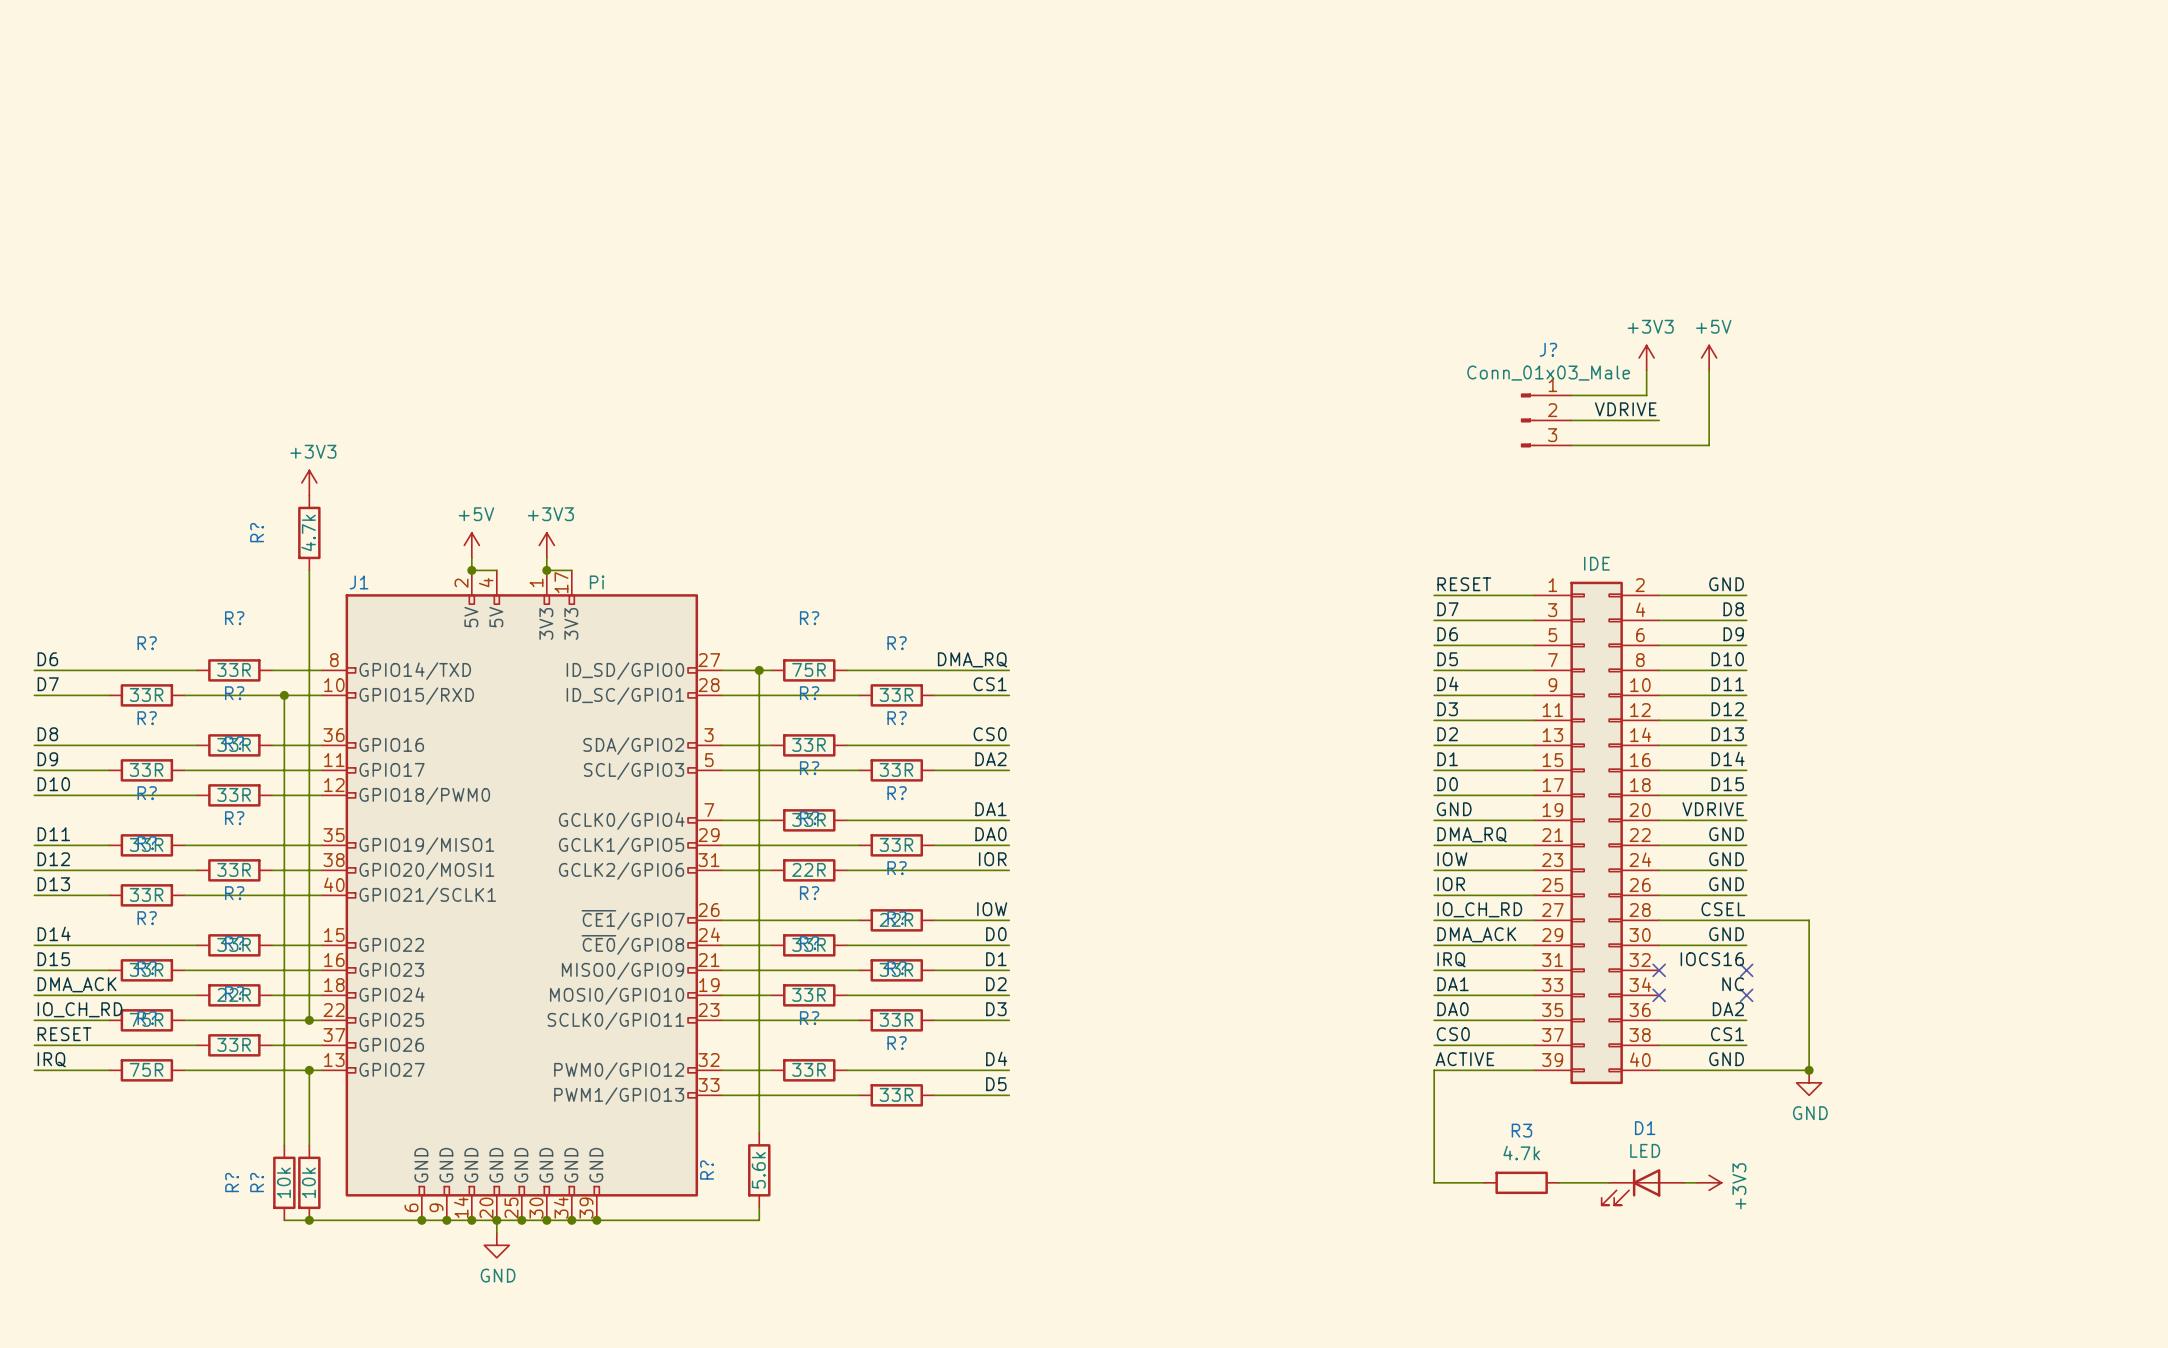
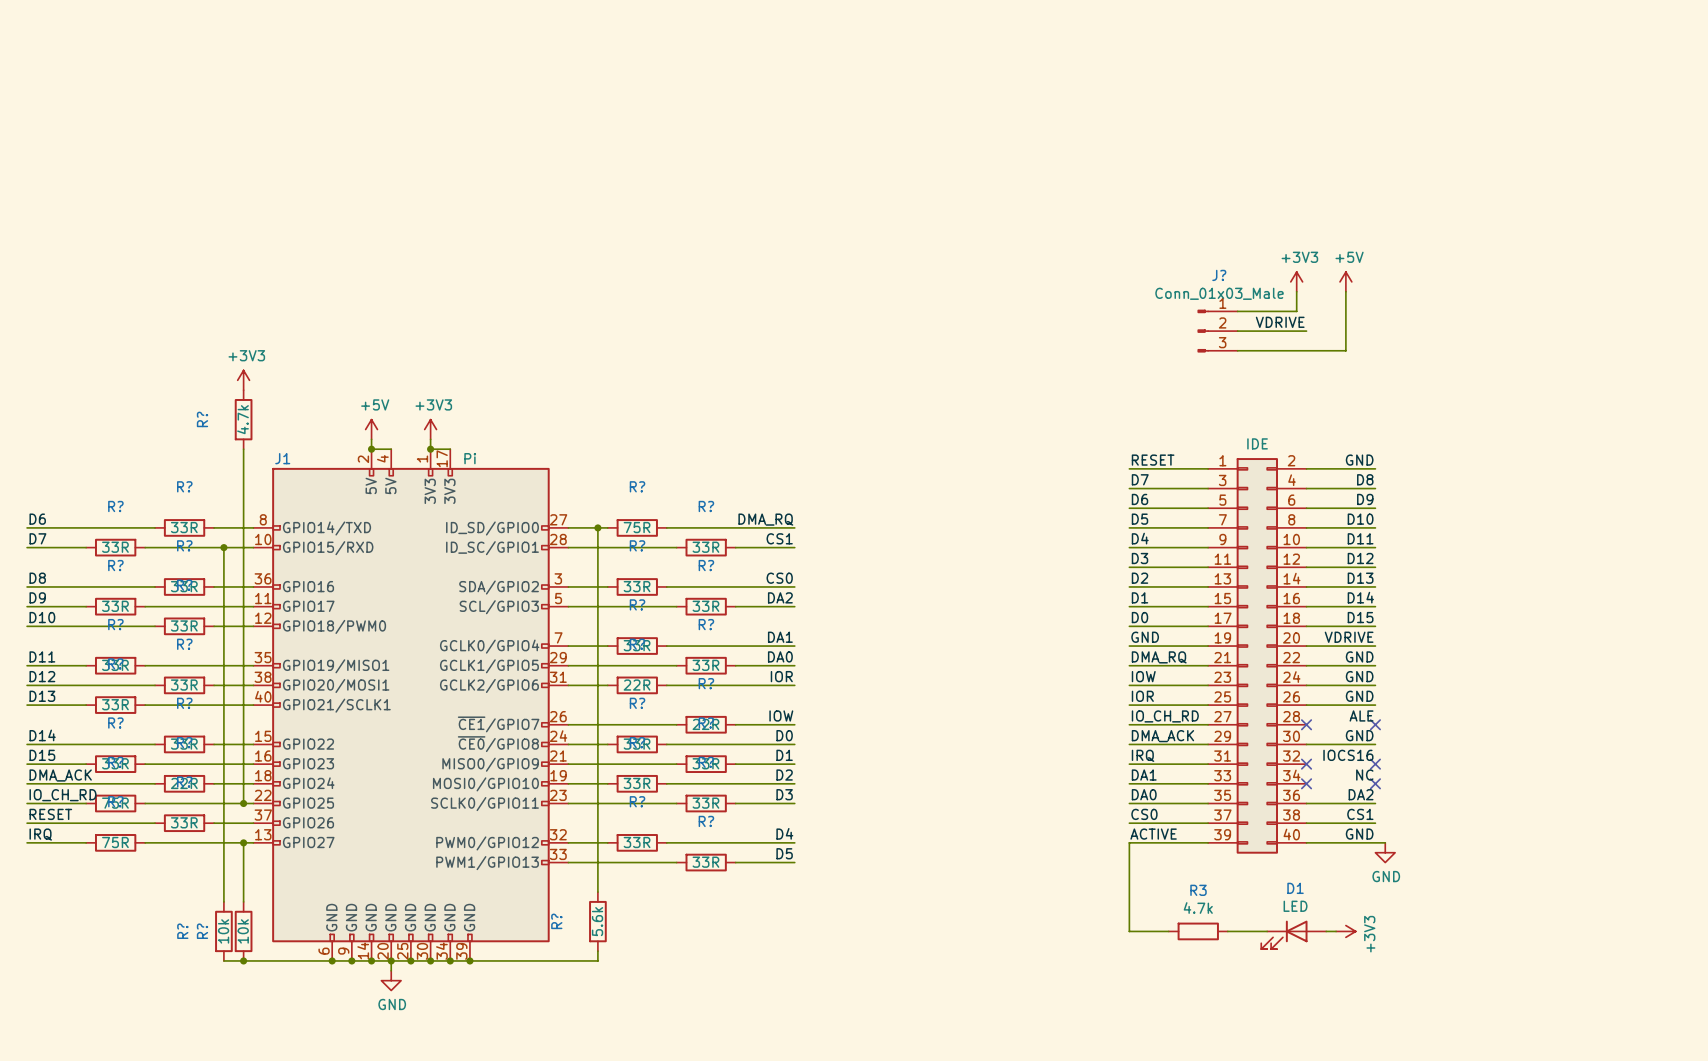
label: CSEL (1723, 909) -> ALE (1361, 715)
wire: (1659, 920) (1809, 920) (1809, 1070) (1759, 1070) -> none
no-connect mark: none -> (1306, 724)
no-connect mark: none -> (1375, 724)
junction: (1809, 1070) -> none
power symbol position: GND (1809, 1082) -> GND (1385, 852)

